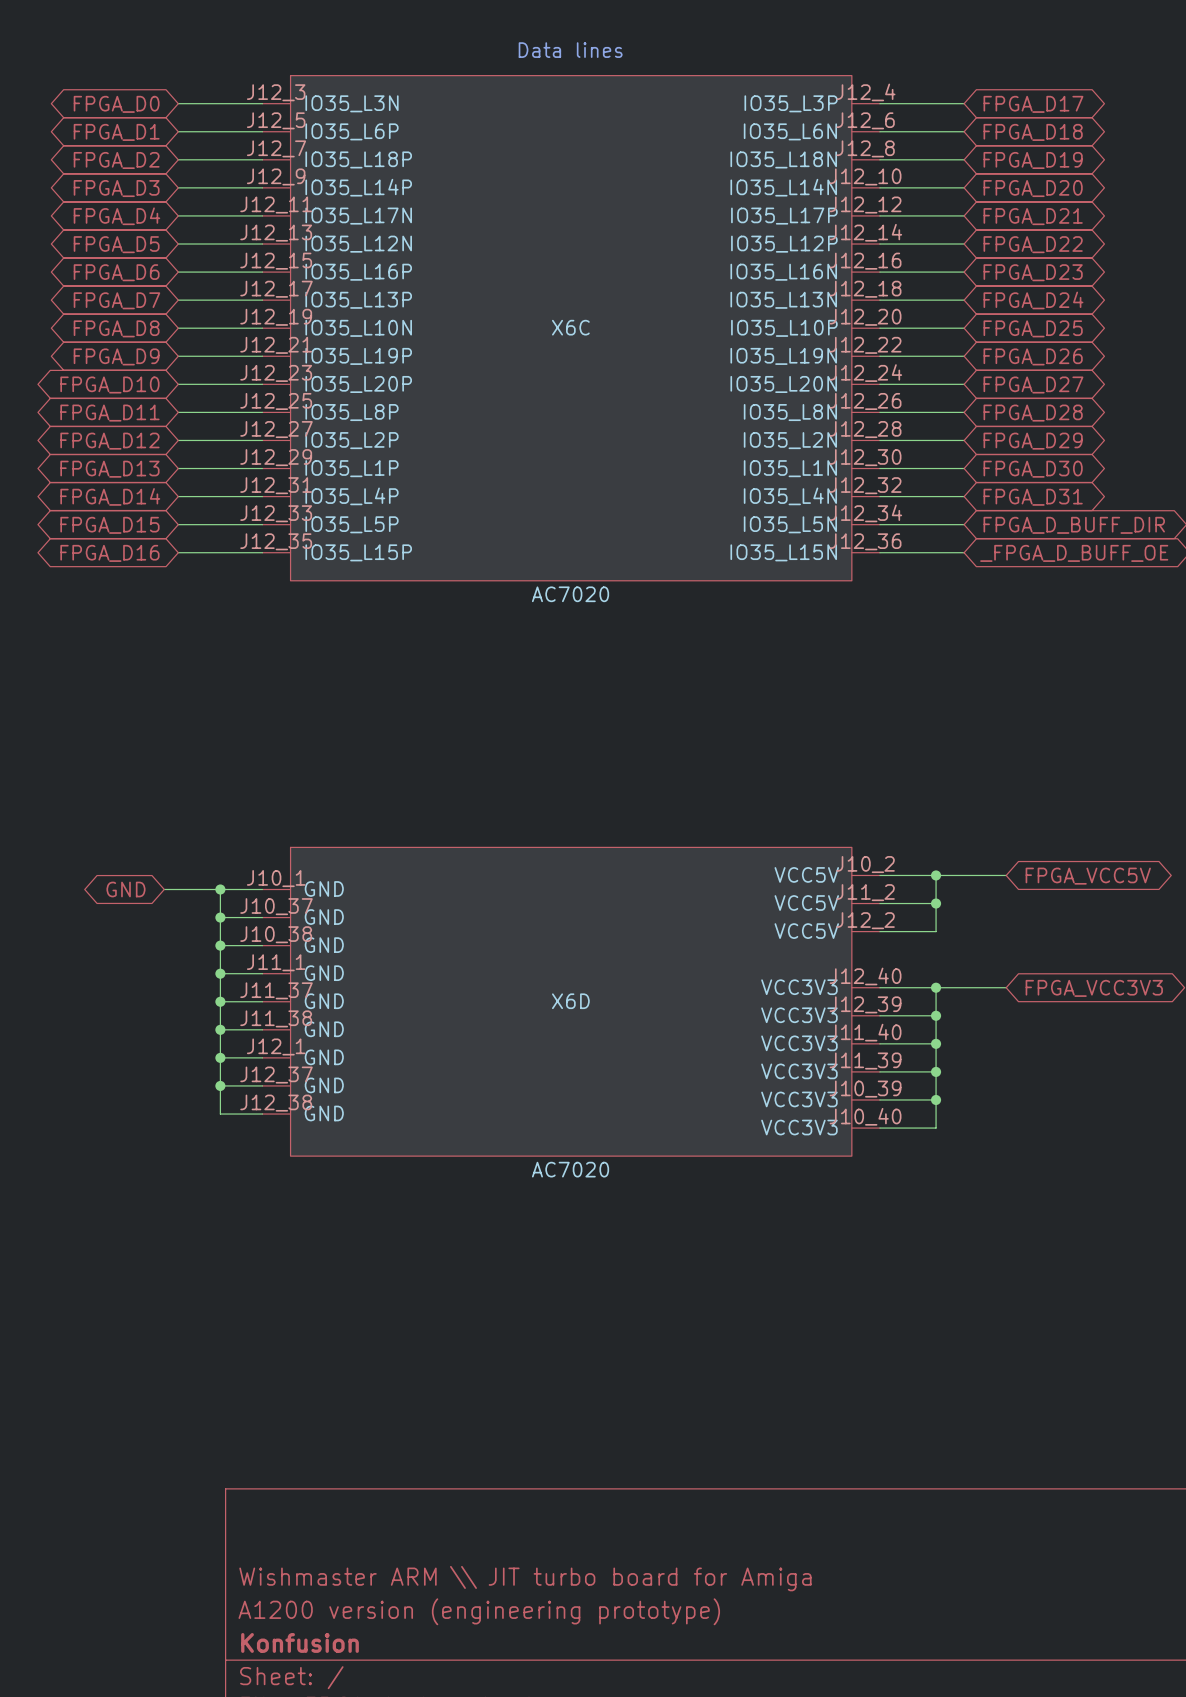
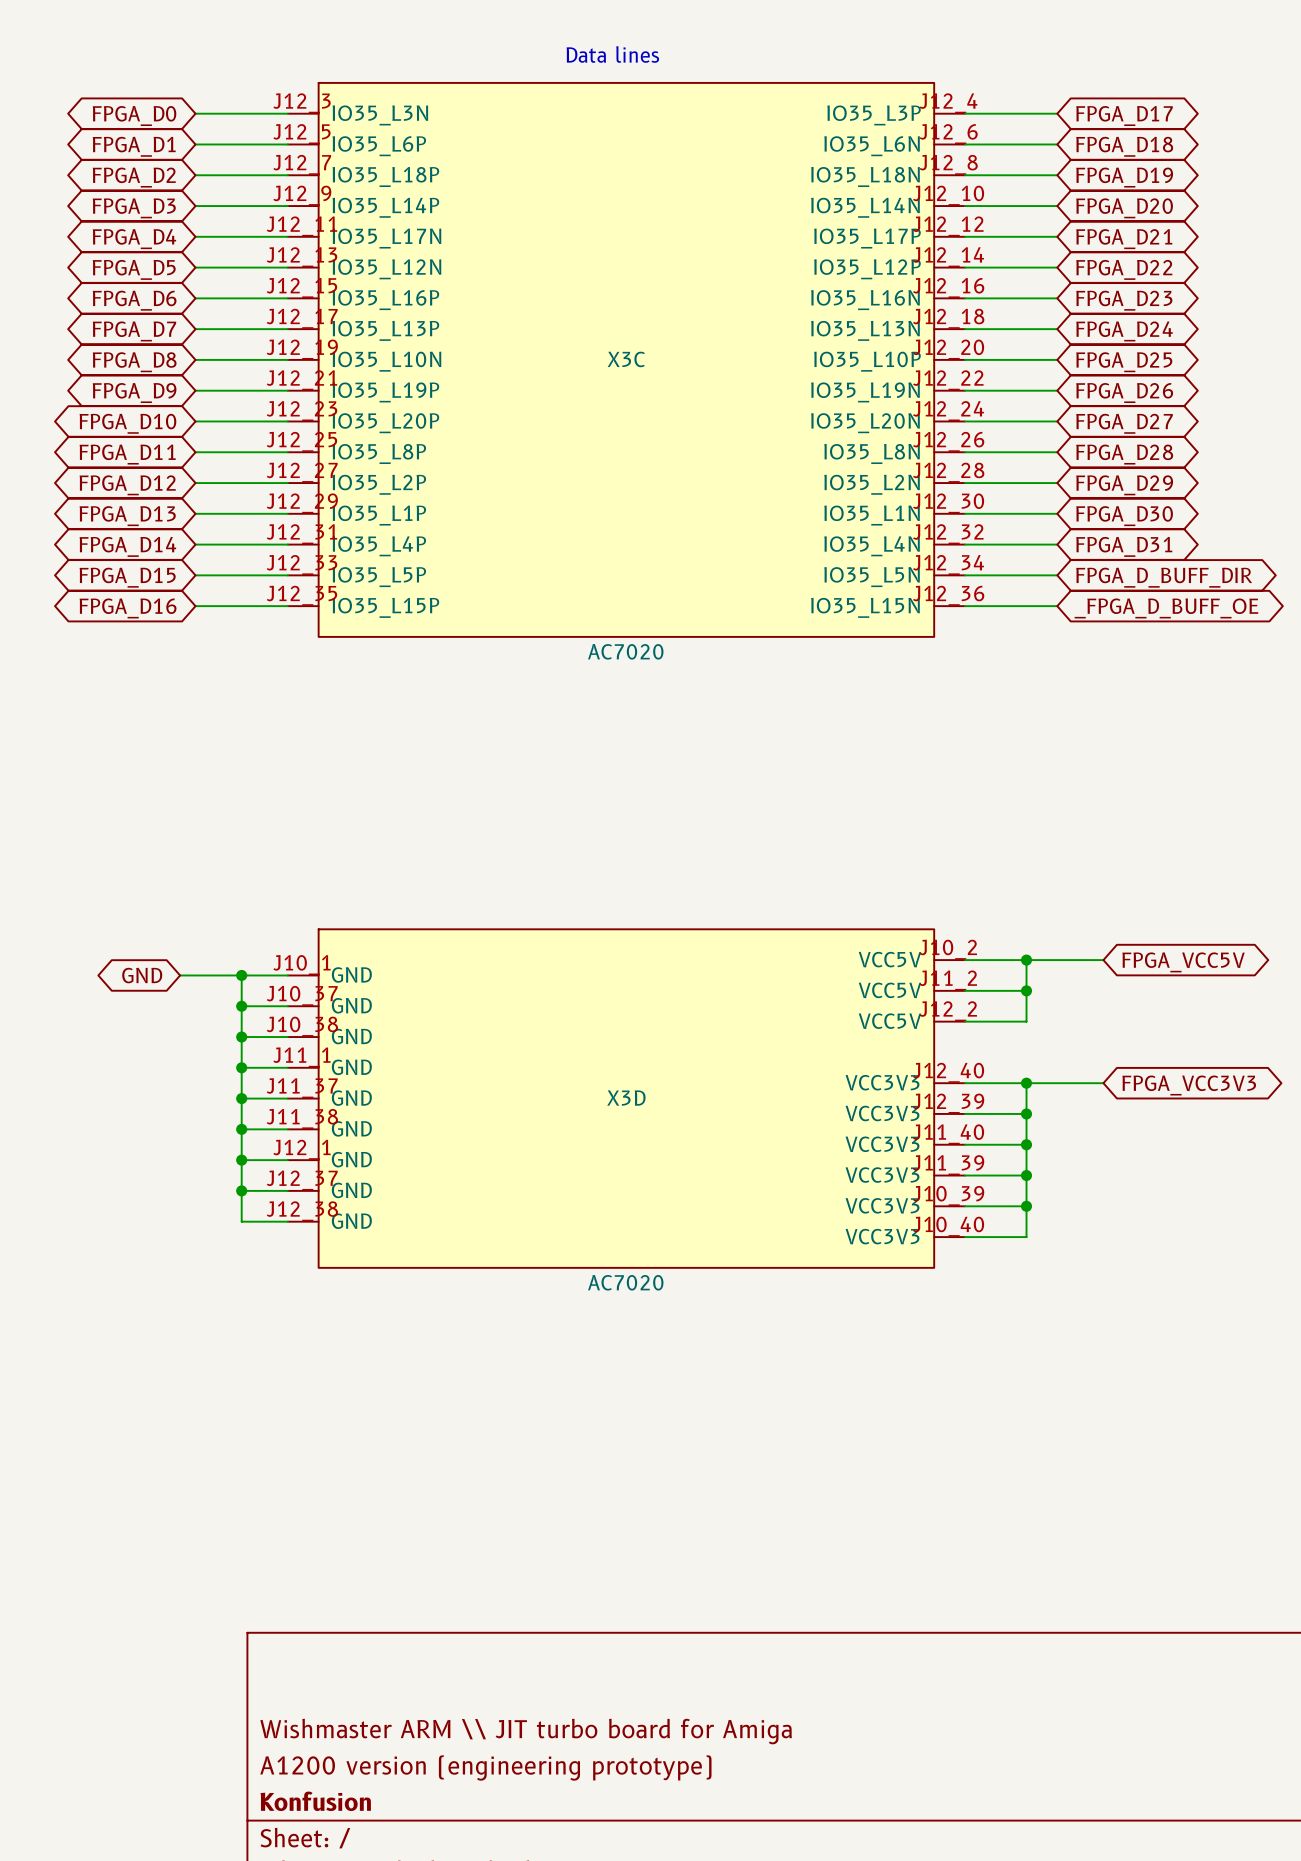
X6C name: X6C (570, 327) -> X3C (626, 359)
X6D name: X6D (570, 1001) -> X3D (626, 1098)

